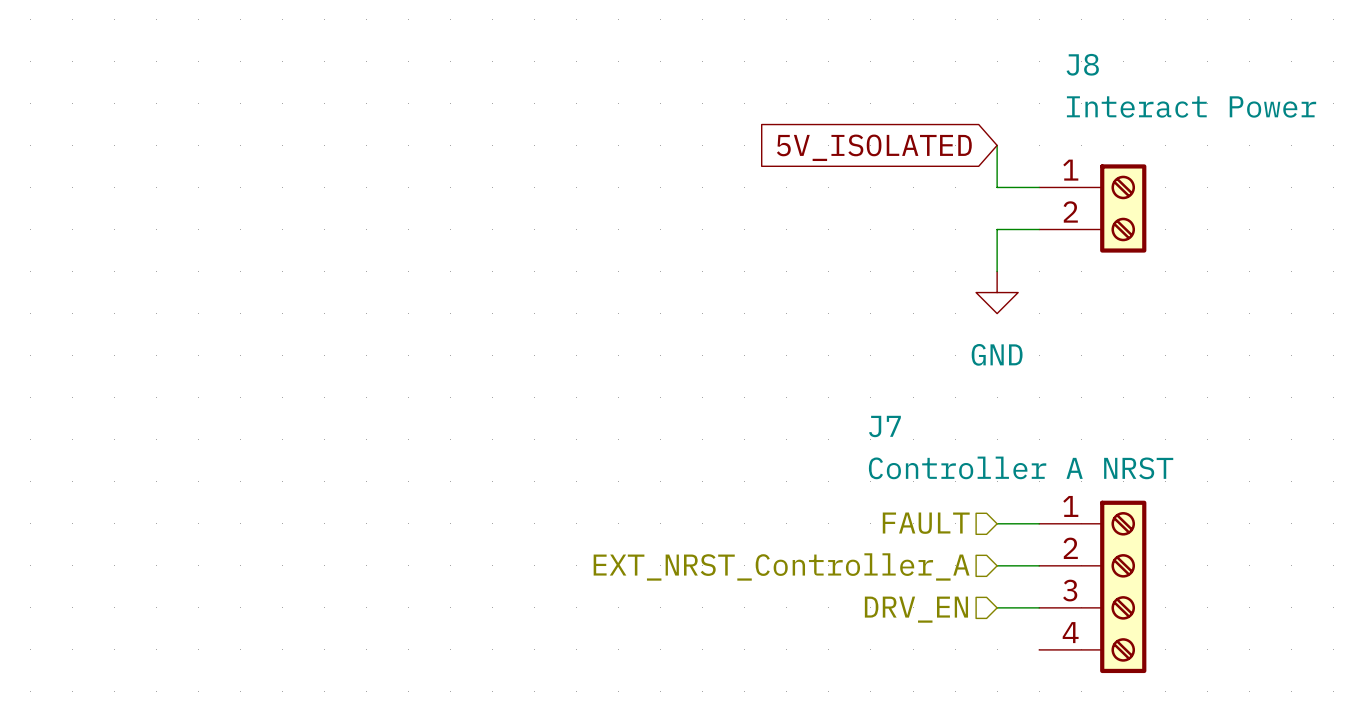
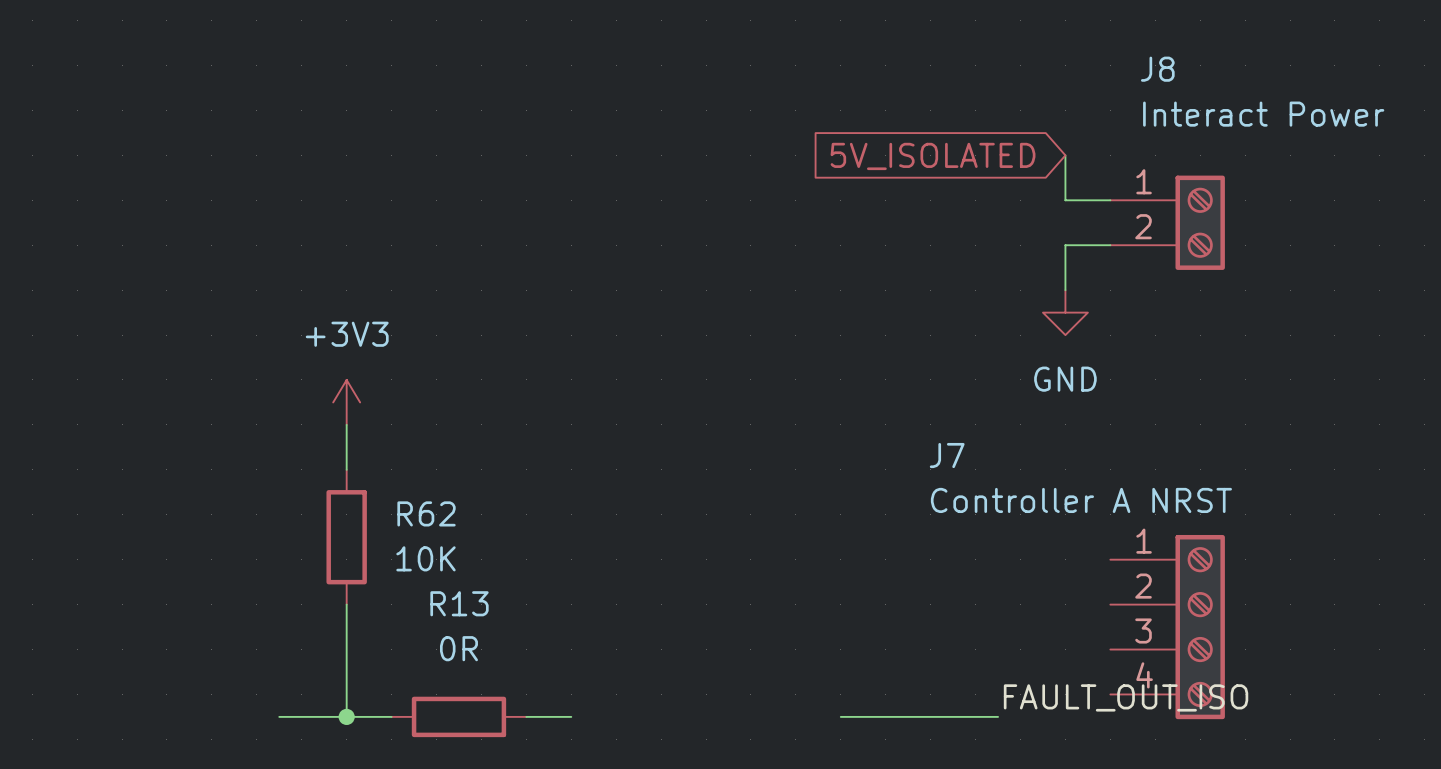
power symbol: none -> +3V3 (346, 402)
wire: none -> (346, 424) (346, 469)
R62: none -> 10K (346, 537)
hierarchical label: FAULT (926, 523) -> none
wire: (997, 523) (1039, 523) -> none
wire: none -> (346, 604) (346, 716)
wire: (997, 565) (1039, 565) -> none
hierarchical label: EXT_NRST_Controller_A (781, 566) -> none
wire: (997, 607) (1039, 607) -> none
hierarchical label: DRV_EN (916, 609) -> none
label: none -> FAULT_OUT_ISO (1126, 697)
wire: none -> (279, 716) (391, 716)
junction: none -> (346, 716)
R13: none -> 0R (458, 716)
wire: none -> (526, 716) (571, 716)
wire: none -> (840, 716) (998, 716)

